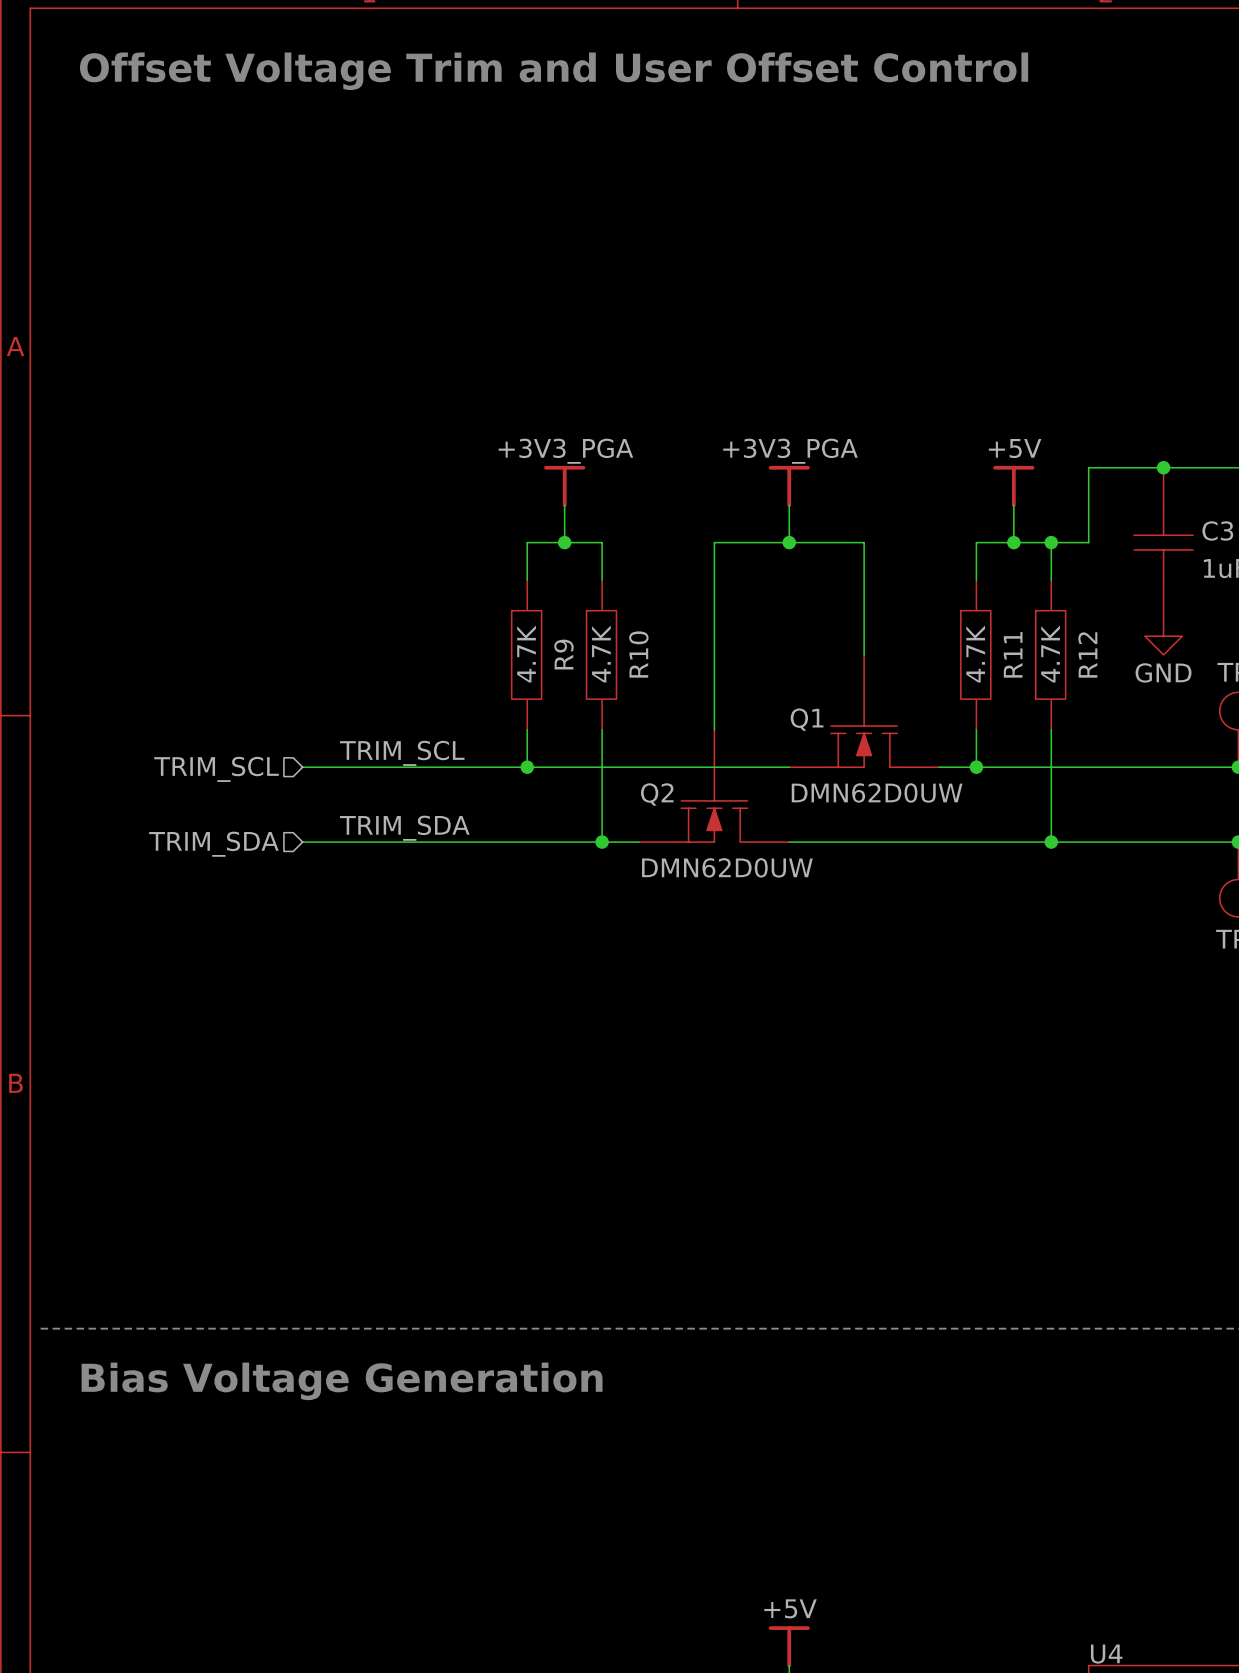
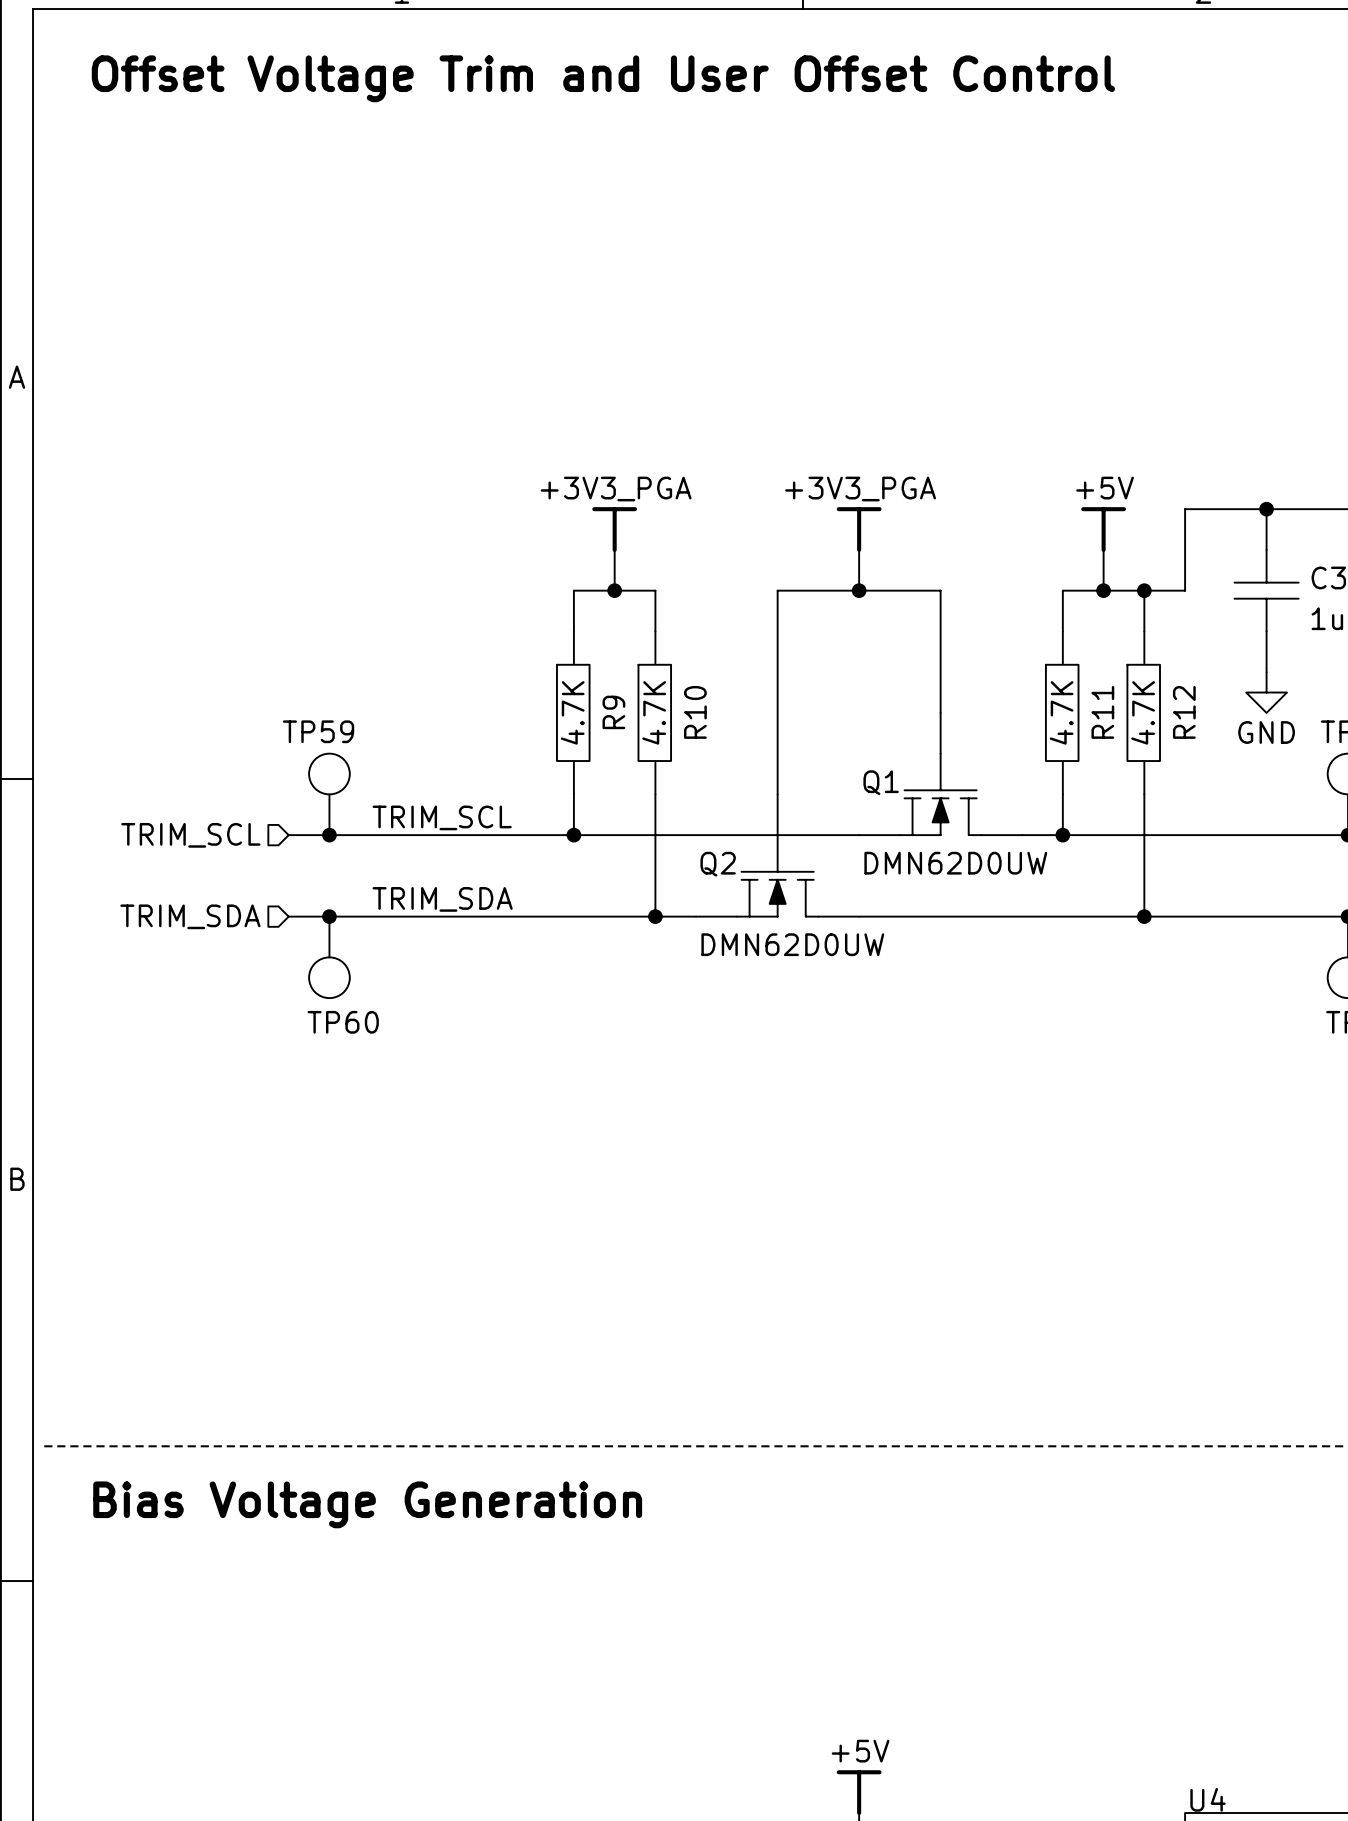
TP59: none -> (329, 794)
wire: none -> (288, 835) (329, 835)
junction: none -> (329, 835)
hierarchical label position: TRIM_SCL (216, 769) -> TRIM_SCL (190, 835)
wire: none -> (288, 916) (329, 916)
junction: none -> (329, 916)
hierarchical label position: TRIM_SDA (213, 844) -> TRIM_SDA (190, 916)
TP60: none -> (329, 957)

